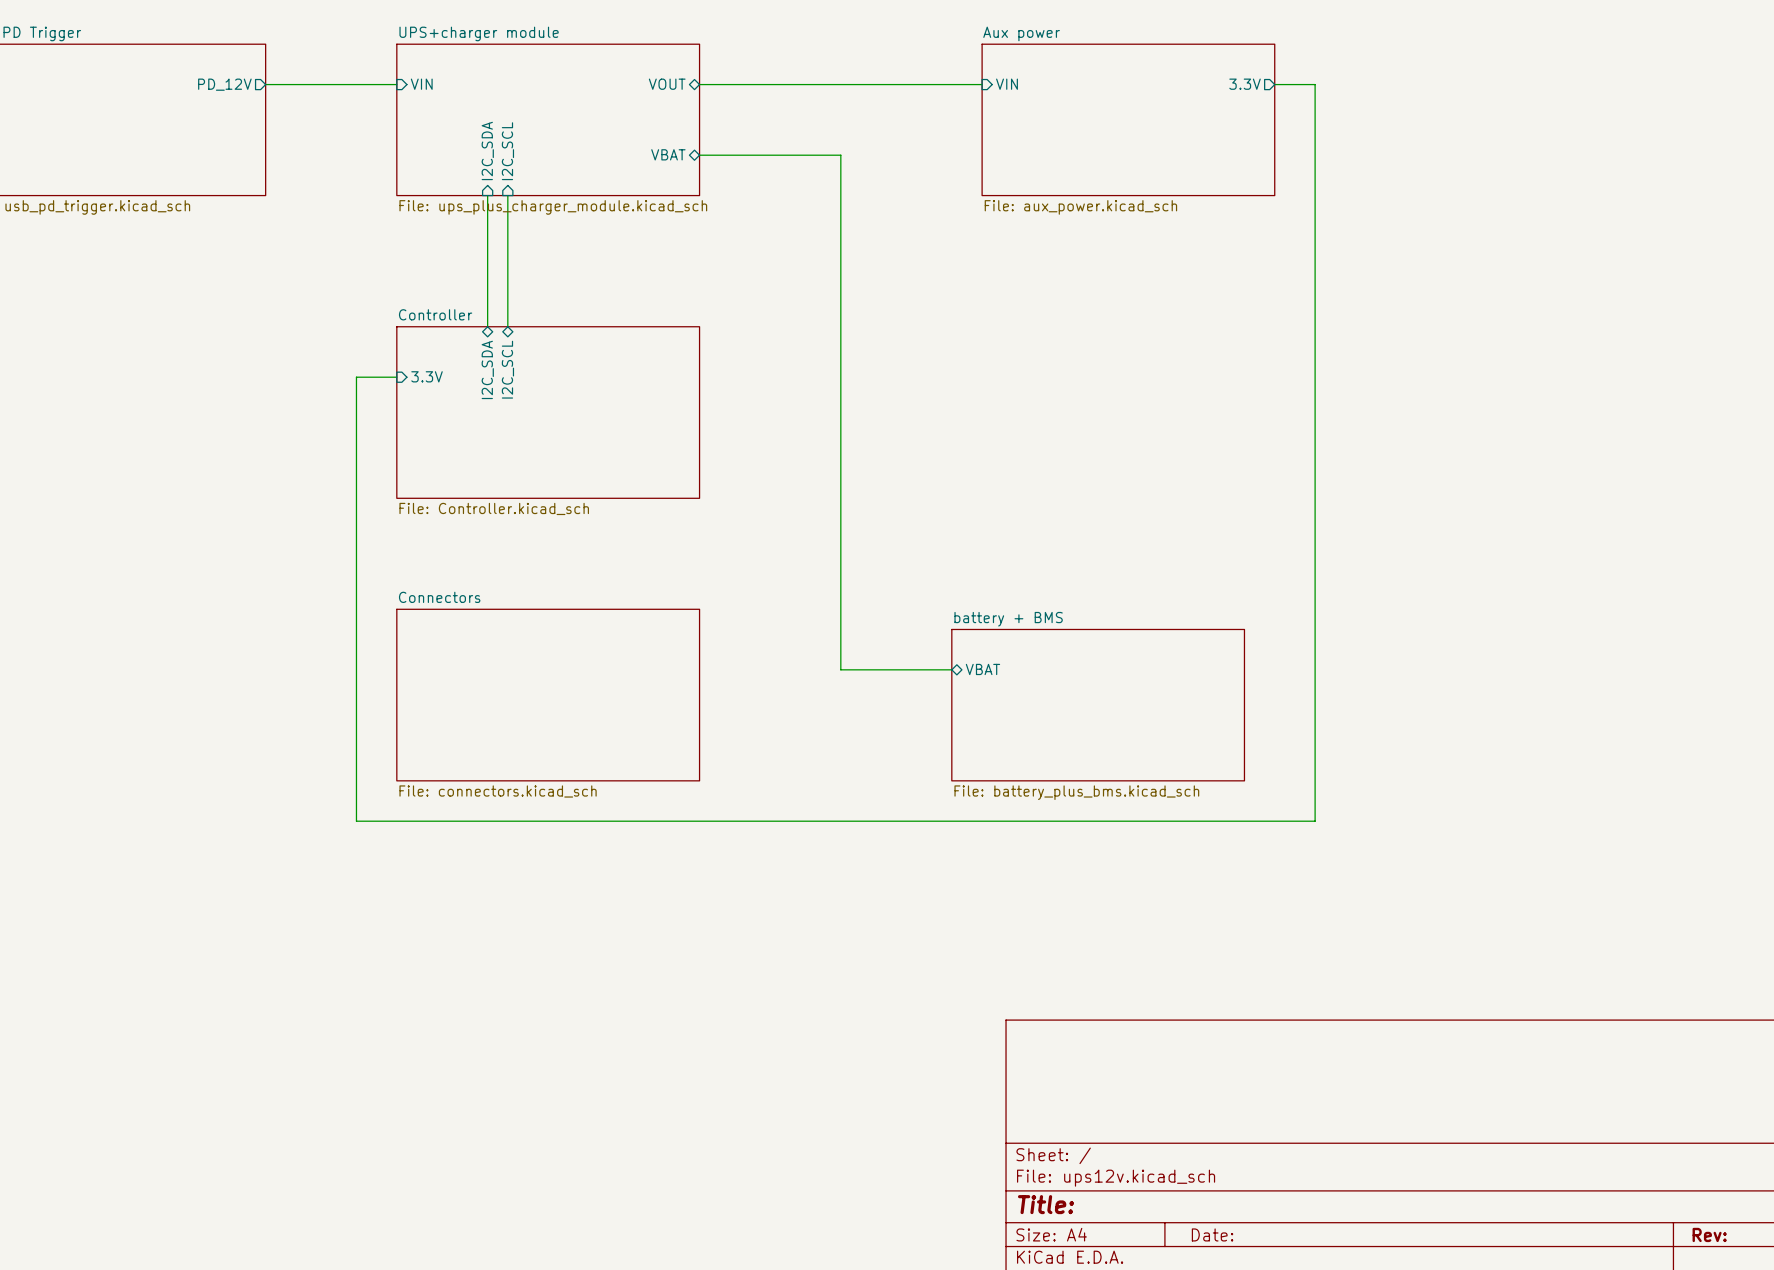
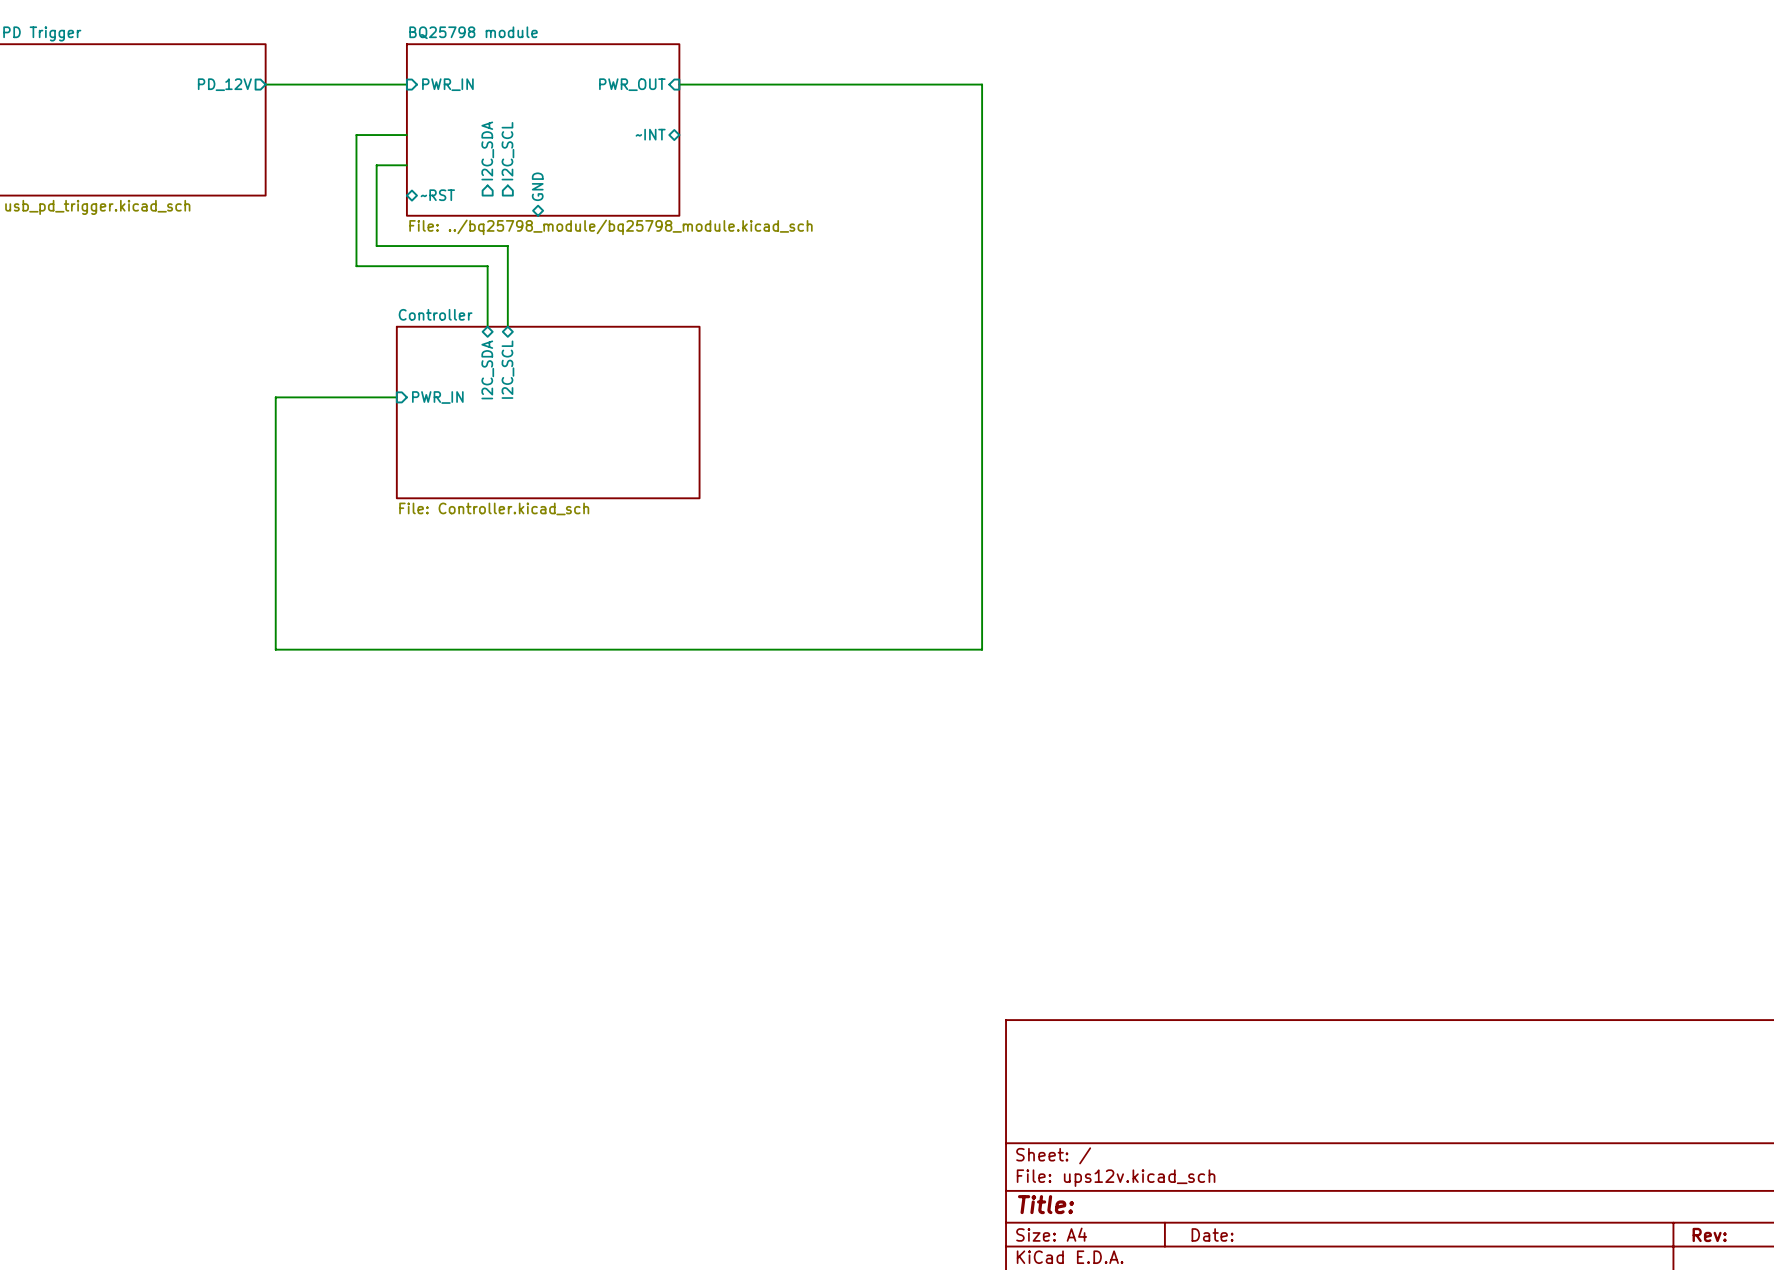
wire: none -> (396, 84) (406, 84)
sheet pin: VIN (421, 84) -> none
sheet pin: none -> PWR_IN (447, 84)
sheet pin: none -> PWR_OUT (632, 84)
sheet pin: VOUT (667, 84) -> none
wire: none -> (679, 84) (699, 84)
wire: none -> (982, 84) (982, 649) (275, 649) (275, 397) (396, 397)
sheet pin: VIN (1007, 84) -> none
sheet pin: 3.3V (1245, 84) -> none
wire: (1274, 84) (1315, 84) (1315, 821) (356, 821) (356, 377) (396, 377) -> none
sheet UPS+charger module: File: ups_plus_charger_module.kicad_sch (548, 119) -> none
sheet Aux power: File: aux_power.kicad_sch (1128, 119) -> none
sheet BQ25798 module: none -> File: ../bq25798_module/bq25798_module.kicad_sch (543, 129)
sheet pin: none -> ~INT (650, 134)
sheet pin: VBAT (668, 154) -> none
wire: (699, 155) (840, 155) (840, 669) (951, 669) -> none
sheet pin: none -> GND (537, 186)
sheet pin: none -> ~RST (437, 195)
wire: (487, 195) (487, 266) -> (406, 135) (356, 135) (356, 266) (487, 266)
wire: (507, 195) (507, 246) -> (406, 165) (376, 165) (376, 246) (507, 246)
sheet pin: 3.3V (427, 376) -> none
sheet pin: none -> PWR_IN (437, 397)
sheet pin: VBAT (982, 669) -> none
sheet Connectors: File: connectors.kicad_sch (548, 695) -> none
sheet battery + BMS: File: battery_plus_bms.kicad_sch (1098, 705) -> none

